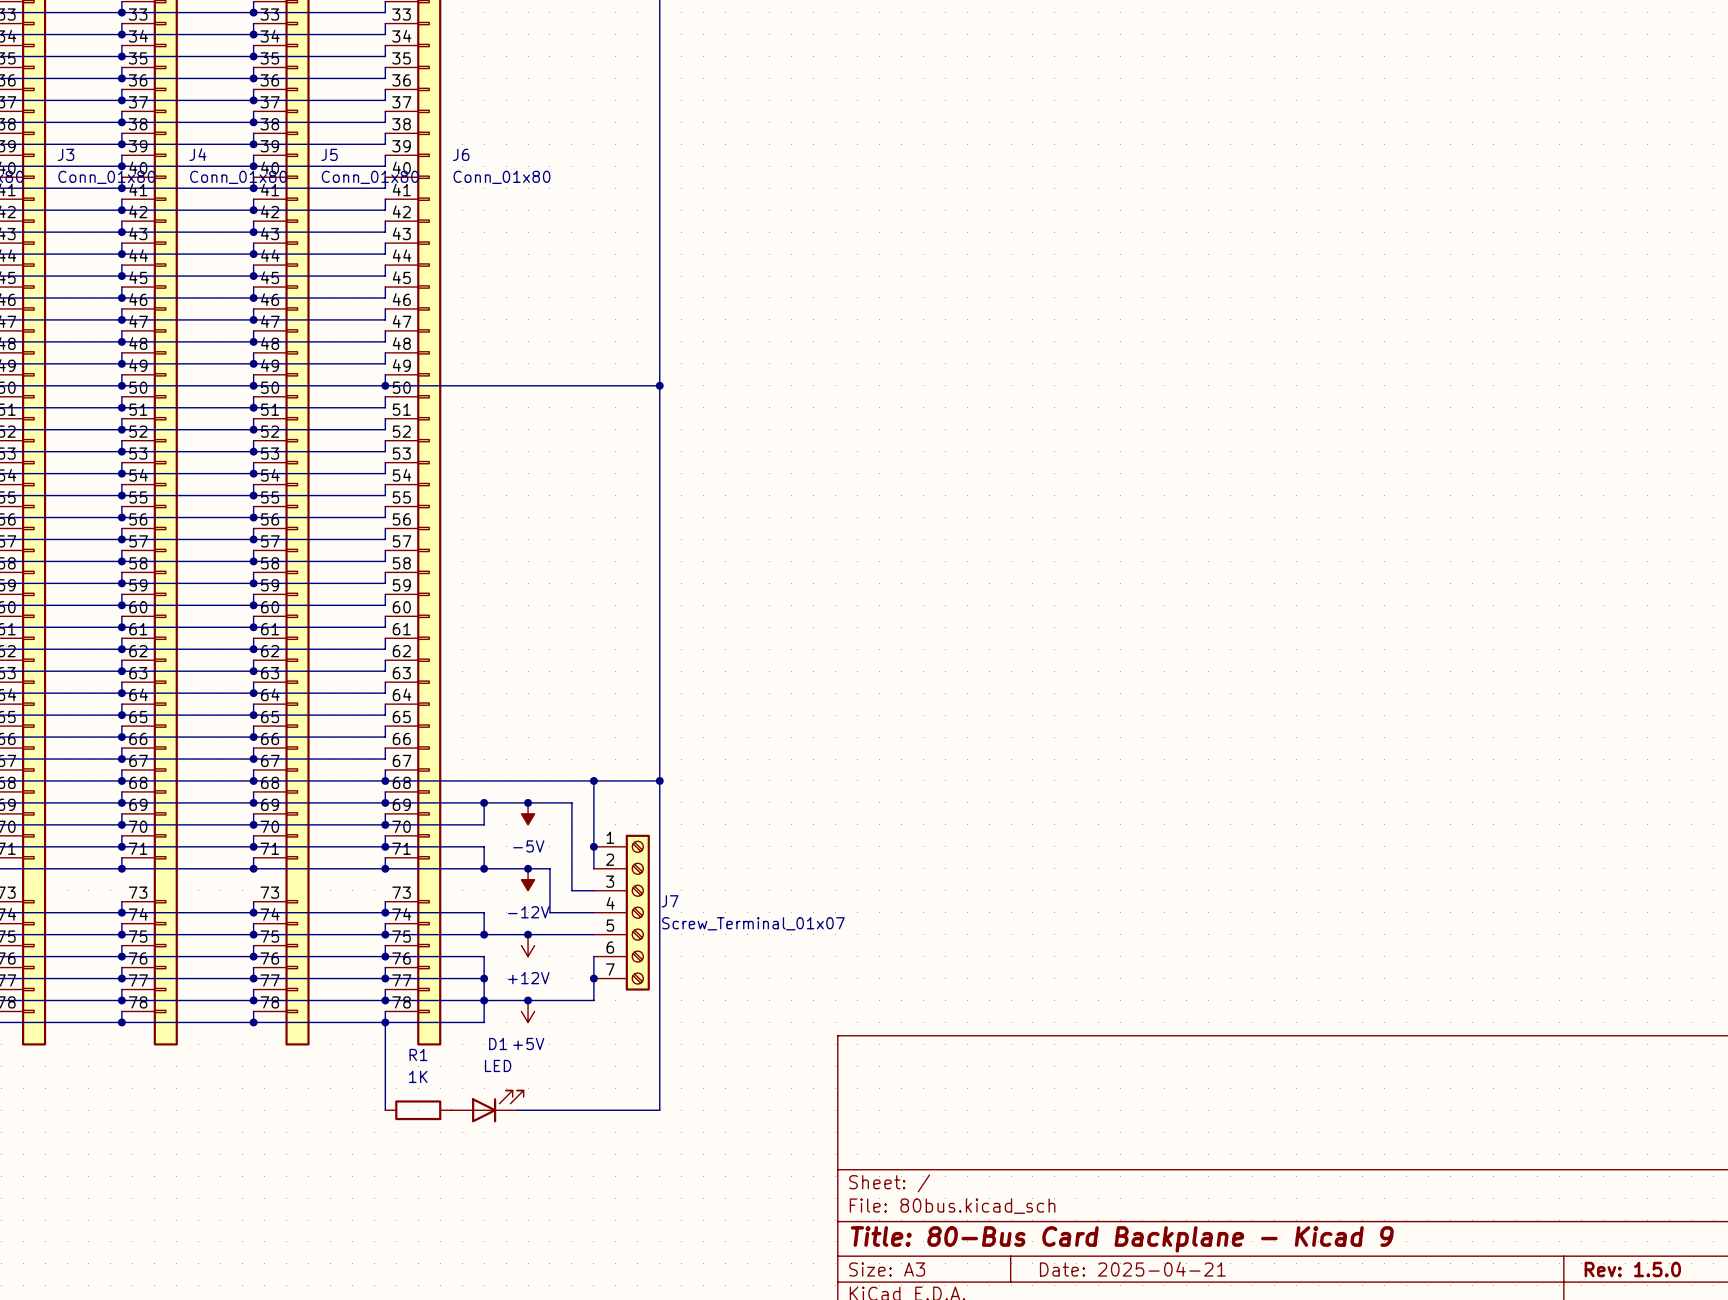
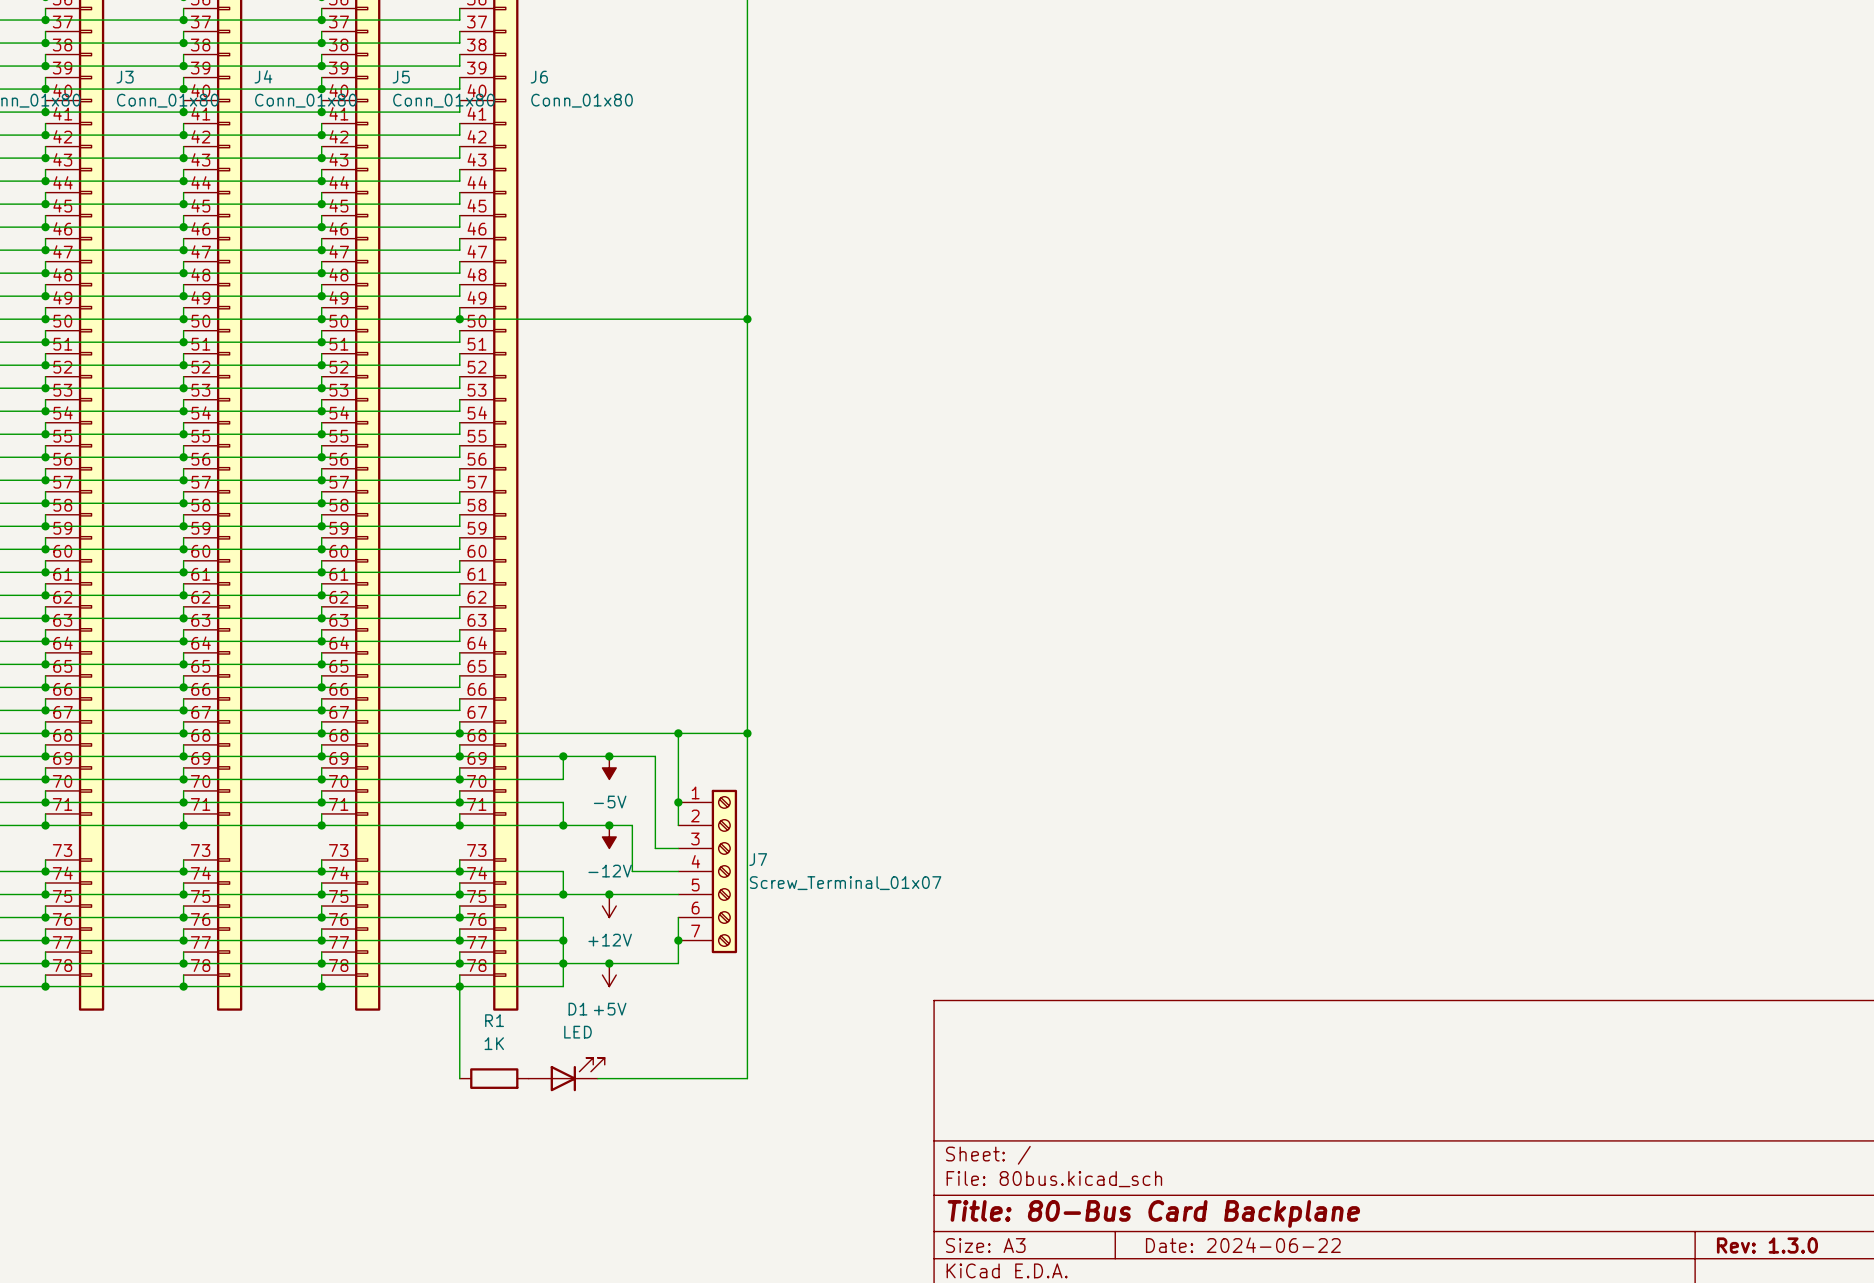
title block: Title: 80-Bus Card Backplane - Kicad 9 (1122, 1239) -> Title: 80-Bus Card Backplane (1153, 1213)
title block: Date: 2025-04-21 (1132, 1269) -> Date: 2024-06-22 (1243, 1245)
title block: Rev: 1.5.0 (1632, 1269) -> Rev: 1.3.0 (1767, 1245)

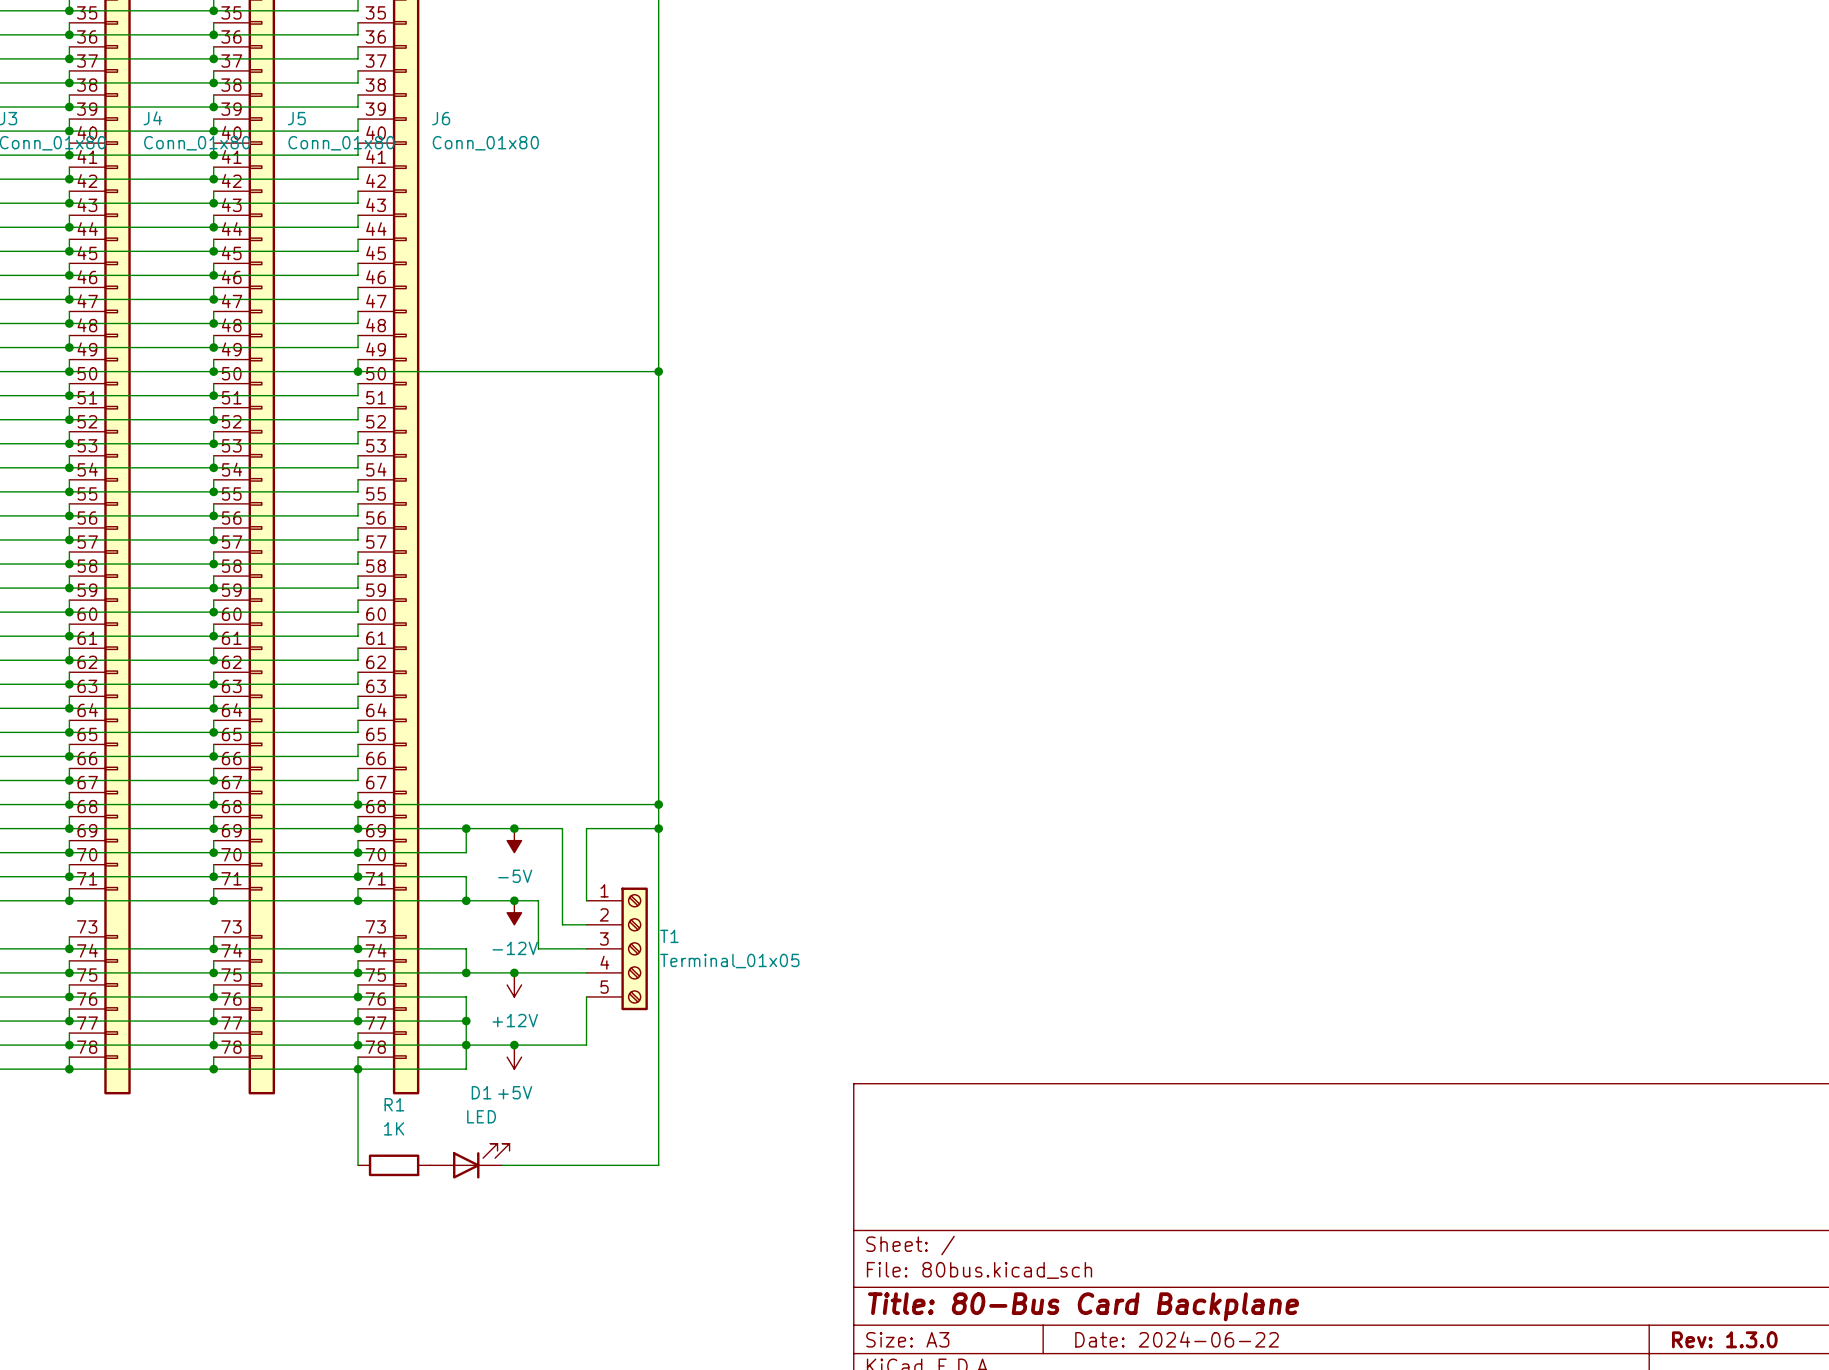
wire: (678, 733) (678, 756) -> (658, 828) (586, 828)
junction: (678, 733) -> none
junction: none -> (658, 828)
junction: (678, 802) -> none
J7: Screw_Terminal_01x07 (707, 871) -> none
T1: none -> Terminal_01x05 (617, 948)
junction: (678, 940) -> none

